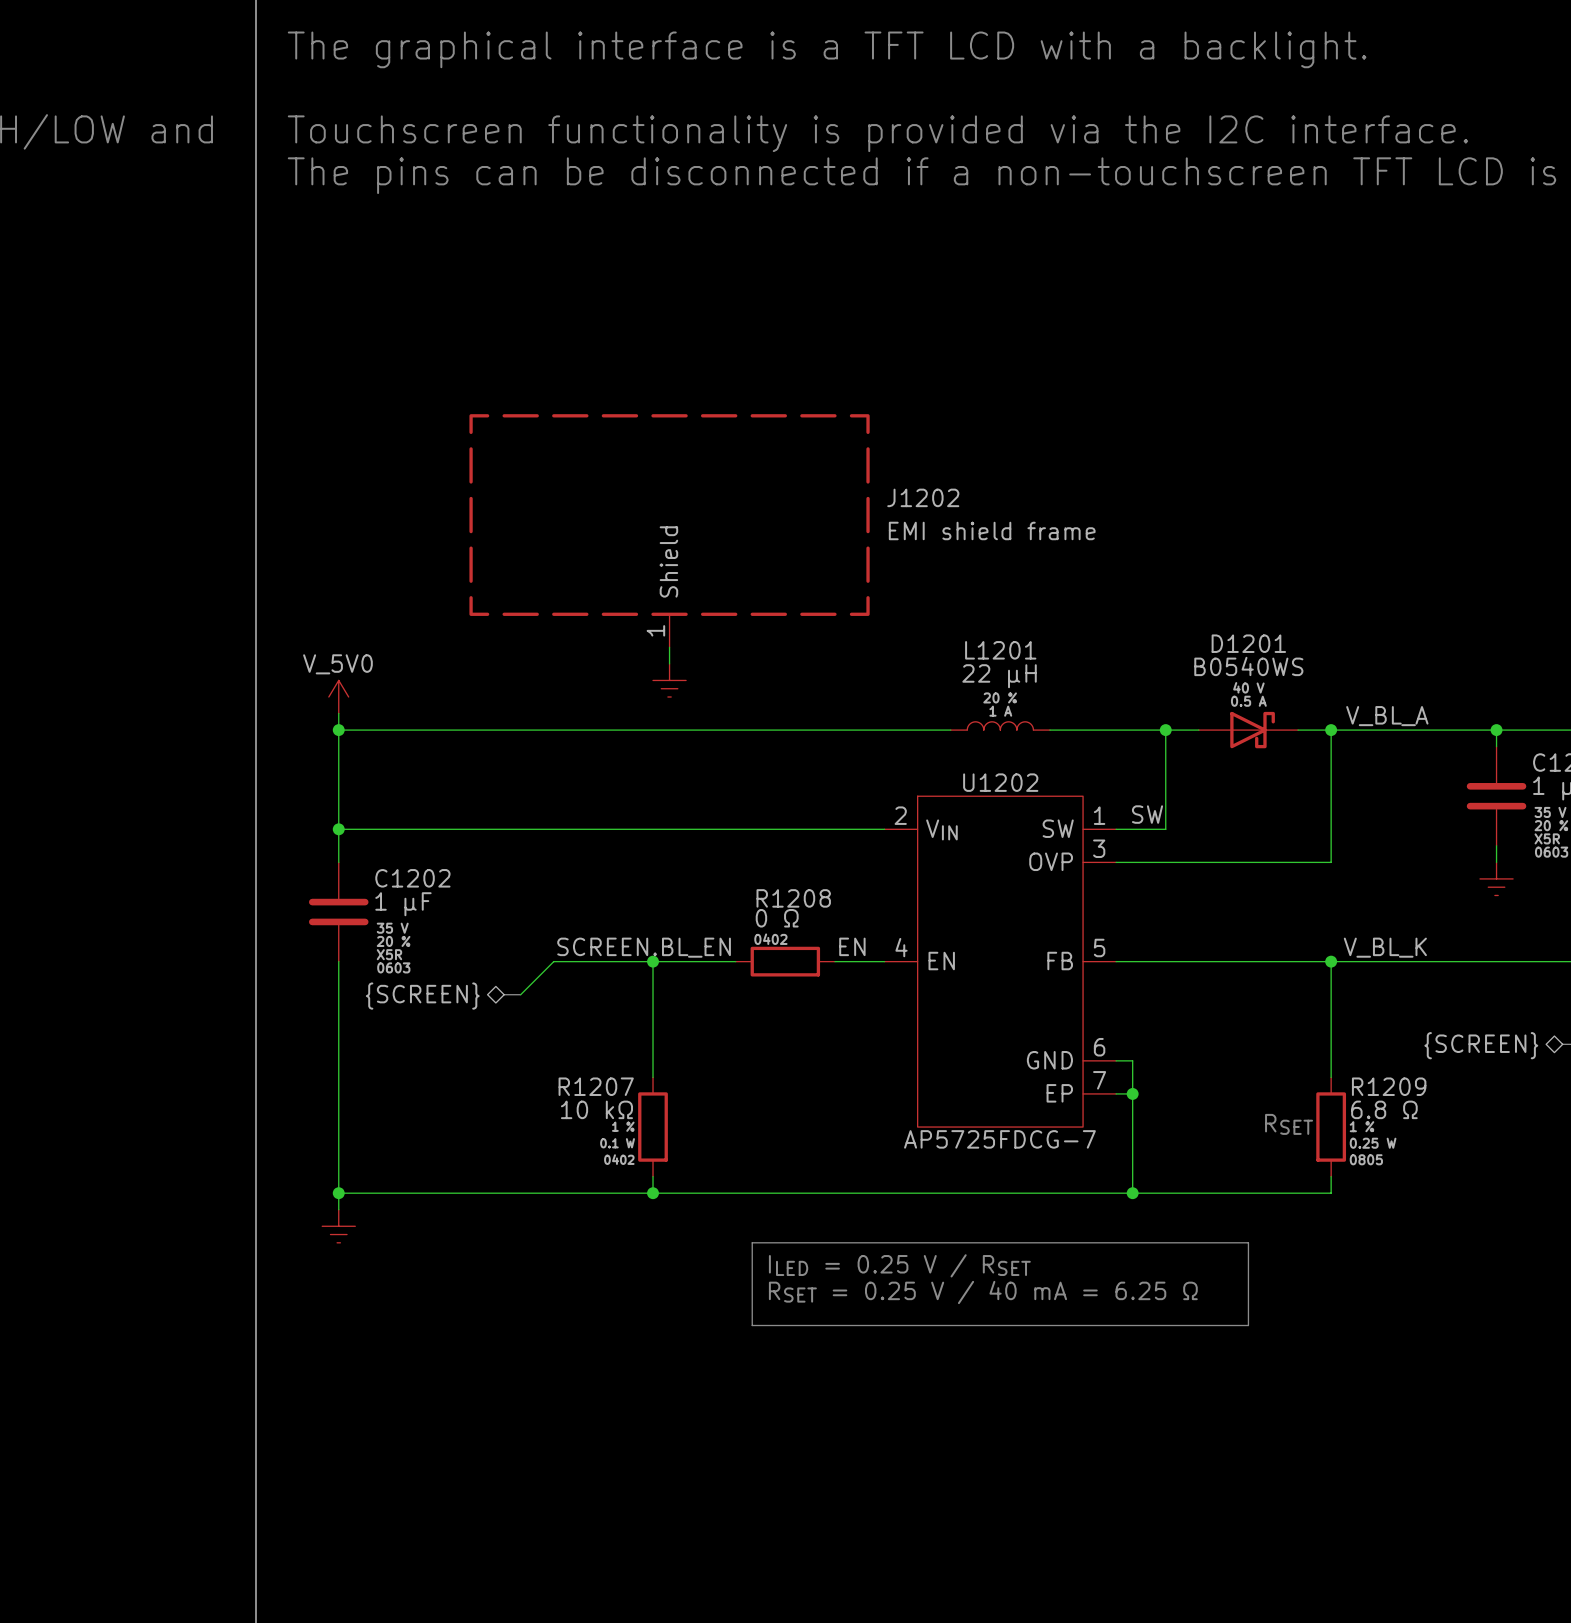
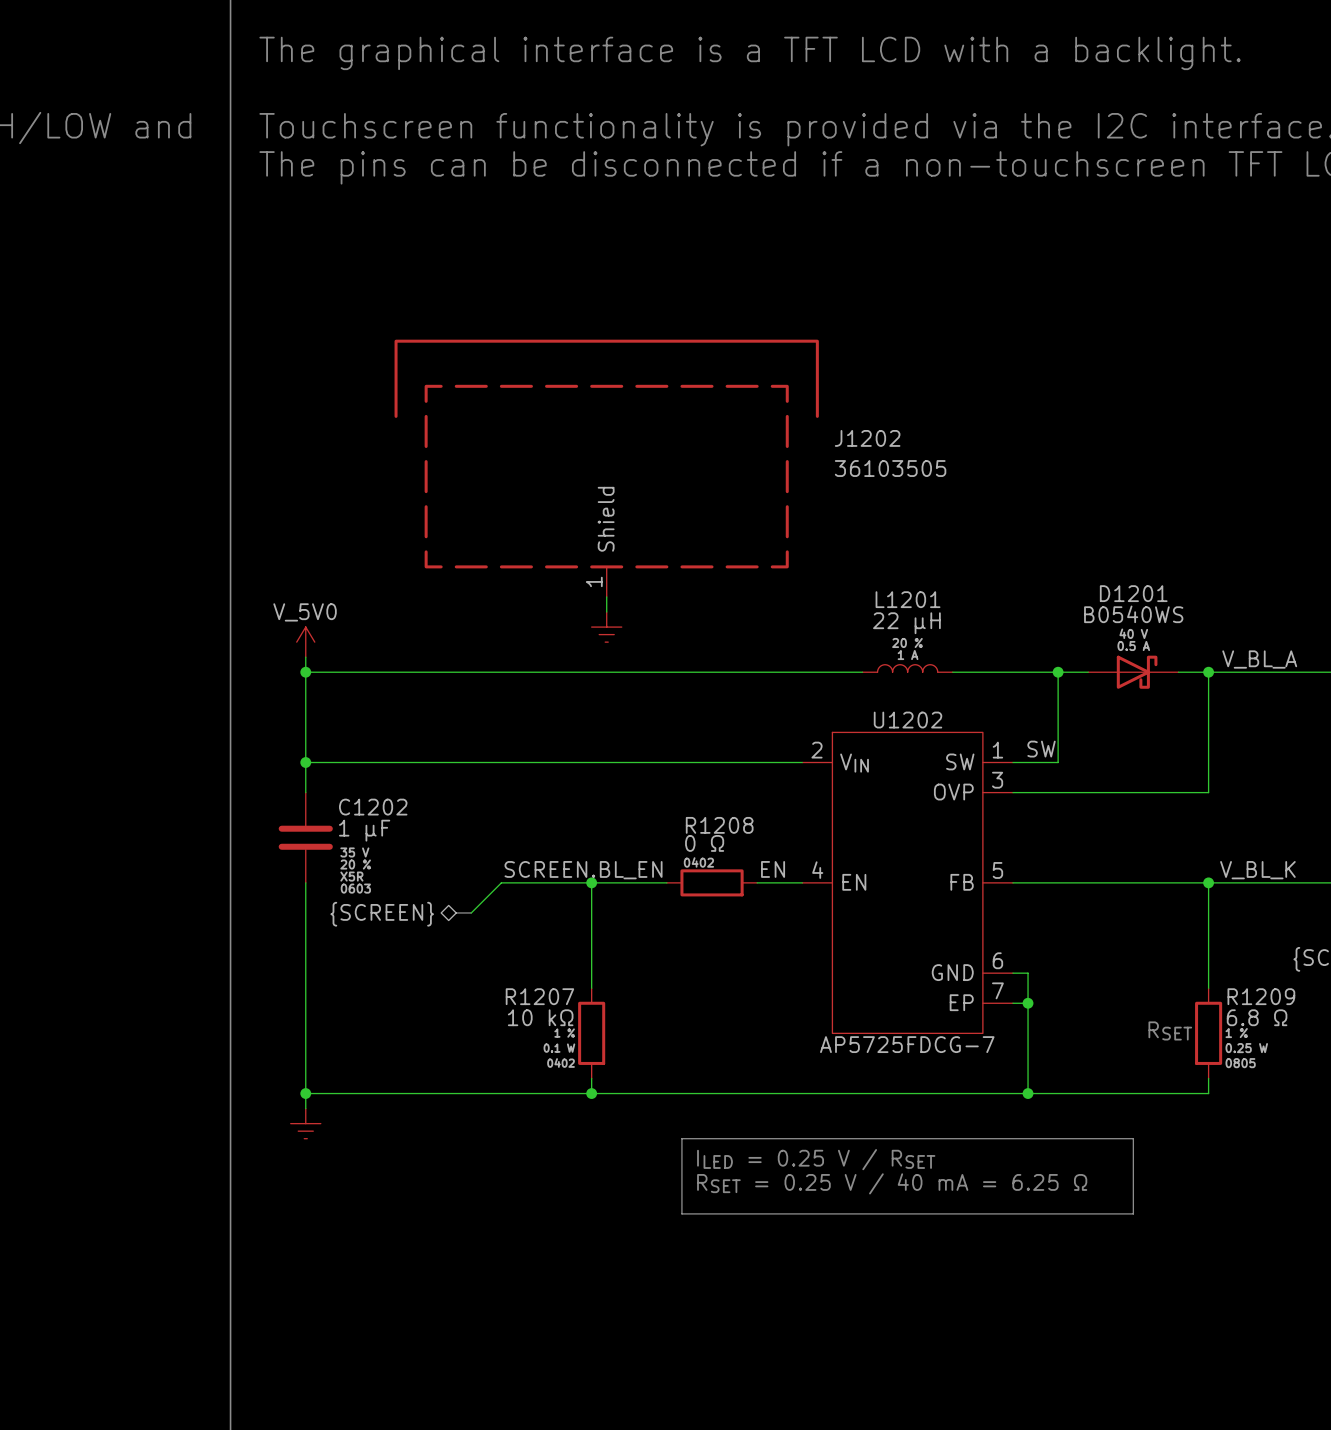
J1202 symbol: [469, 414, 870, 648] -> [394, 339, 819, 597]
J1202 name position: J1202 (923, 497) -> J1202 (867, 438)
J1202 value: EMI shield frame (992, 530) -> 36103505 (890, 468)

